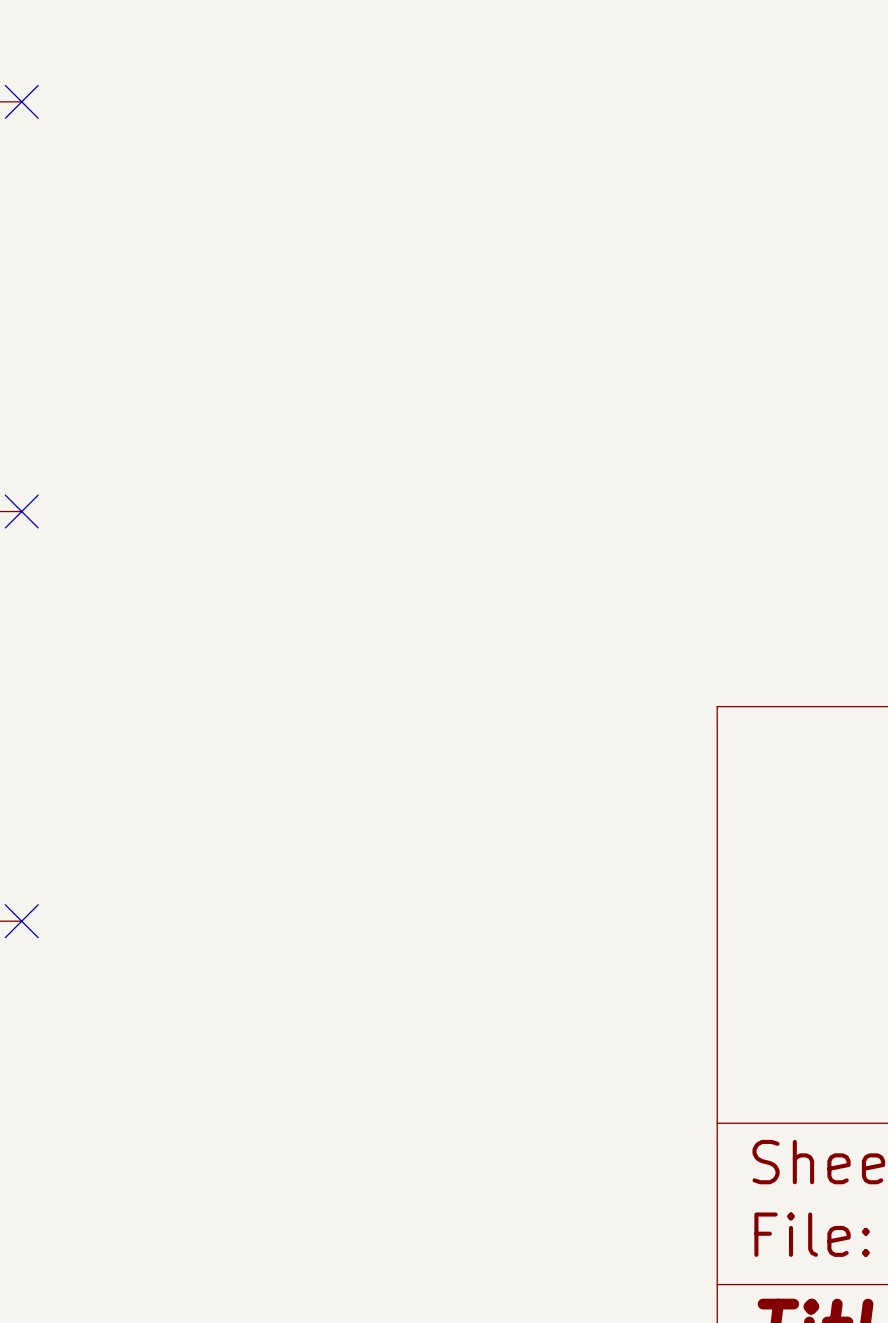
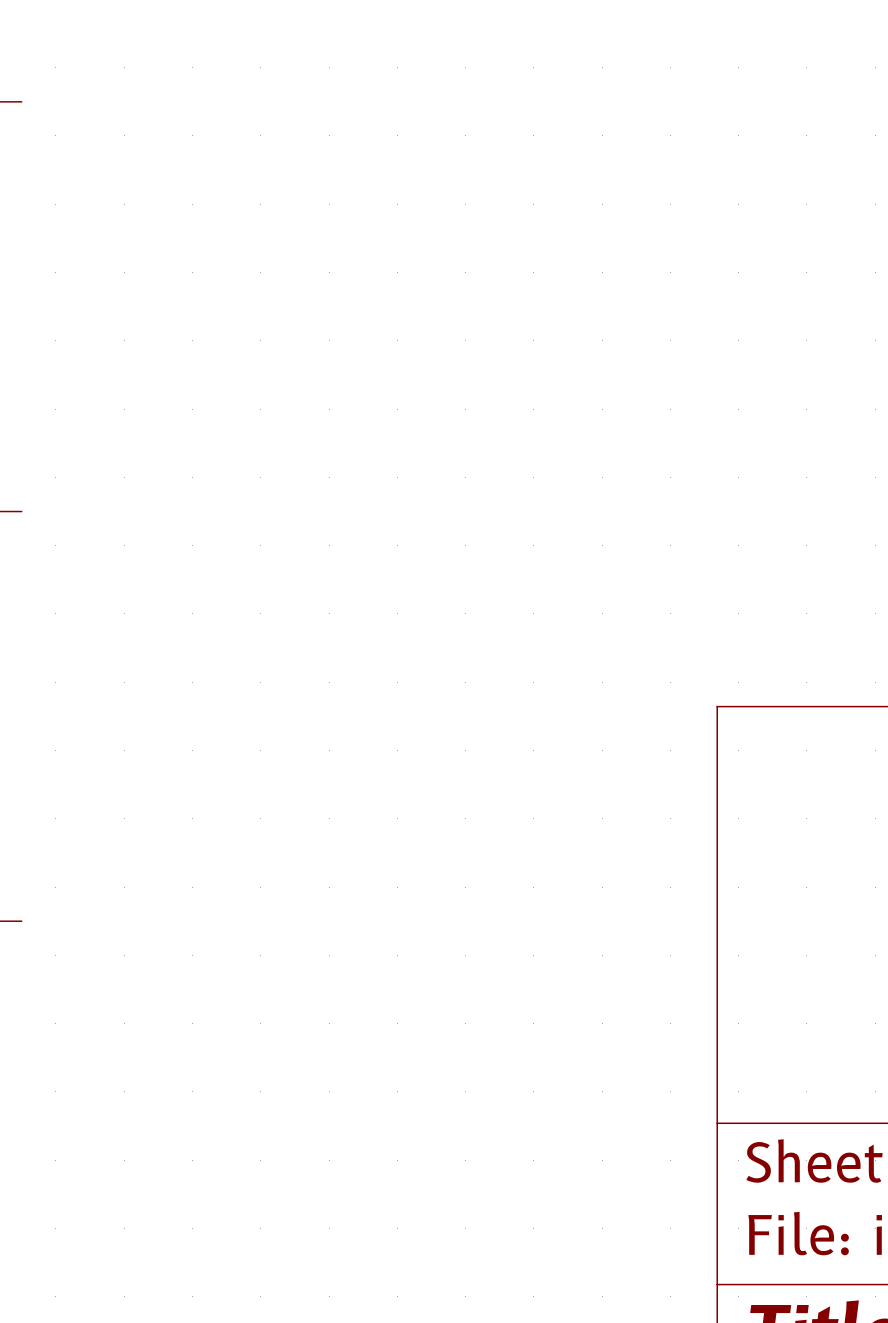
no-connect mark: (21, 101) -> none
no-connect mark: (21, 511) -> none
no-connect mark: (21, 921) -> none

